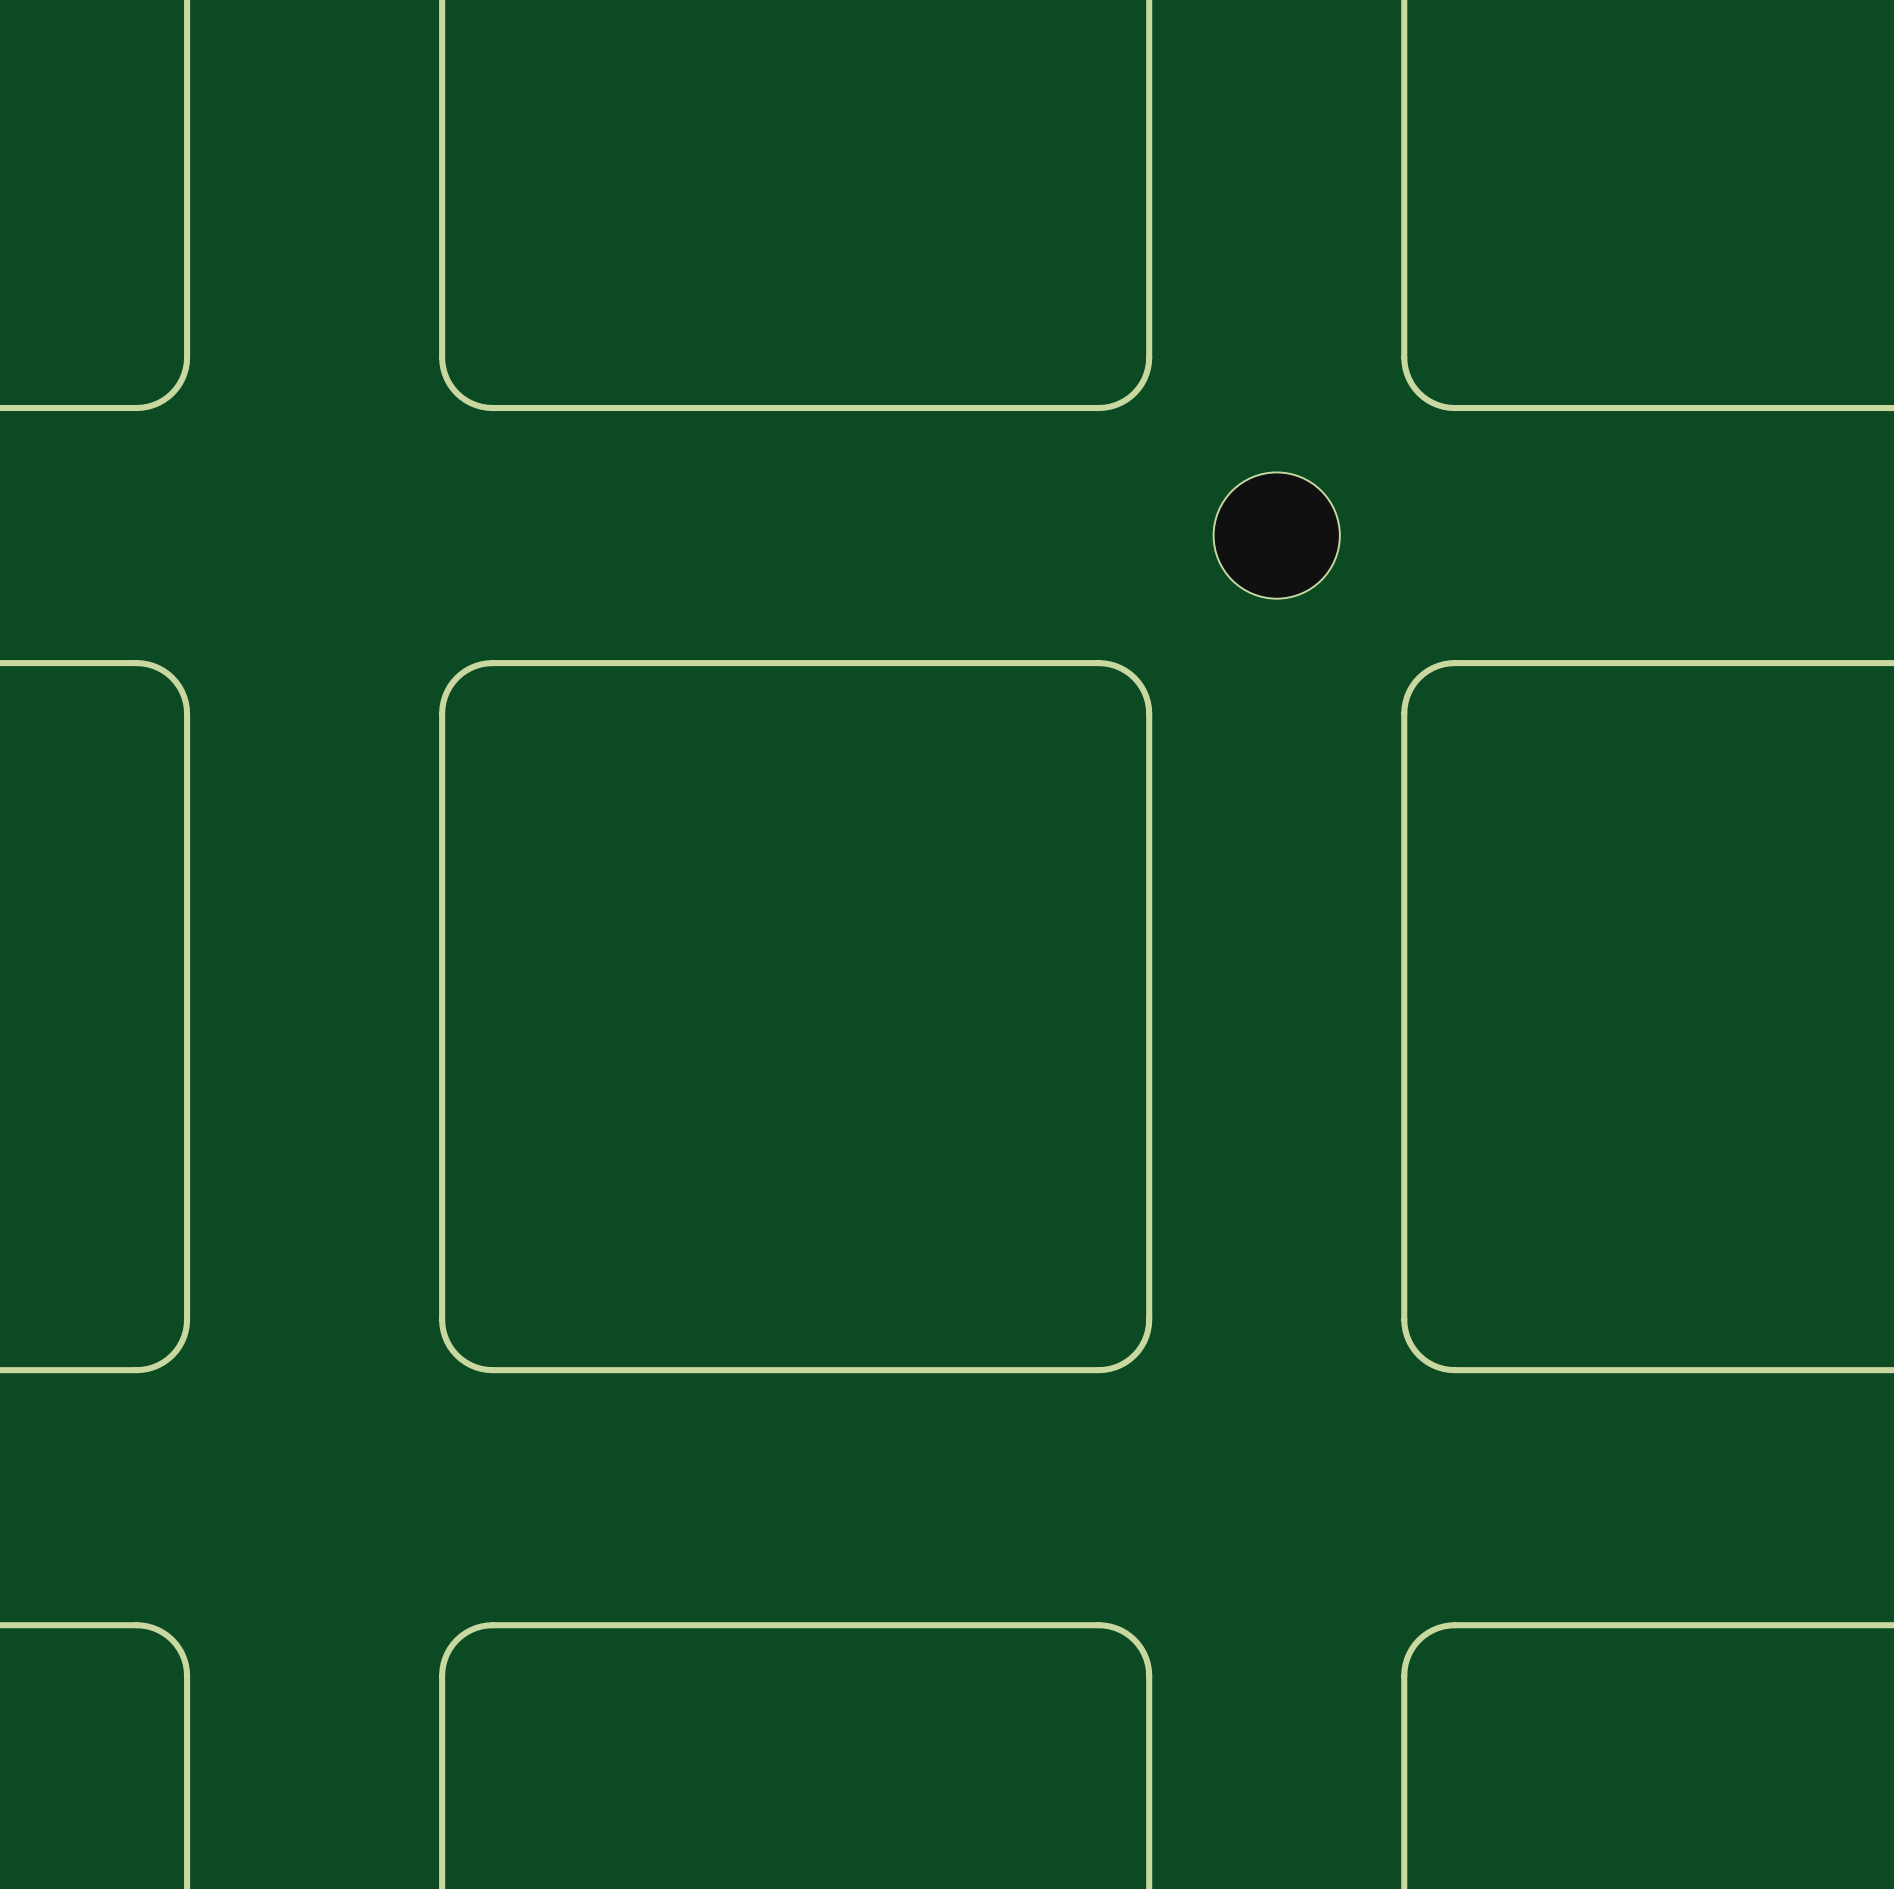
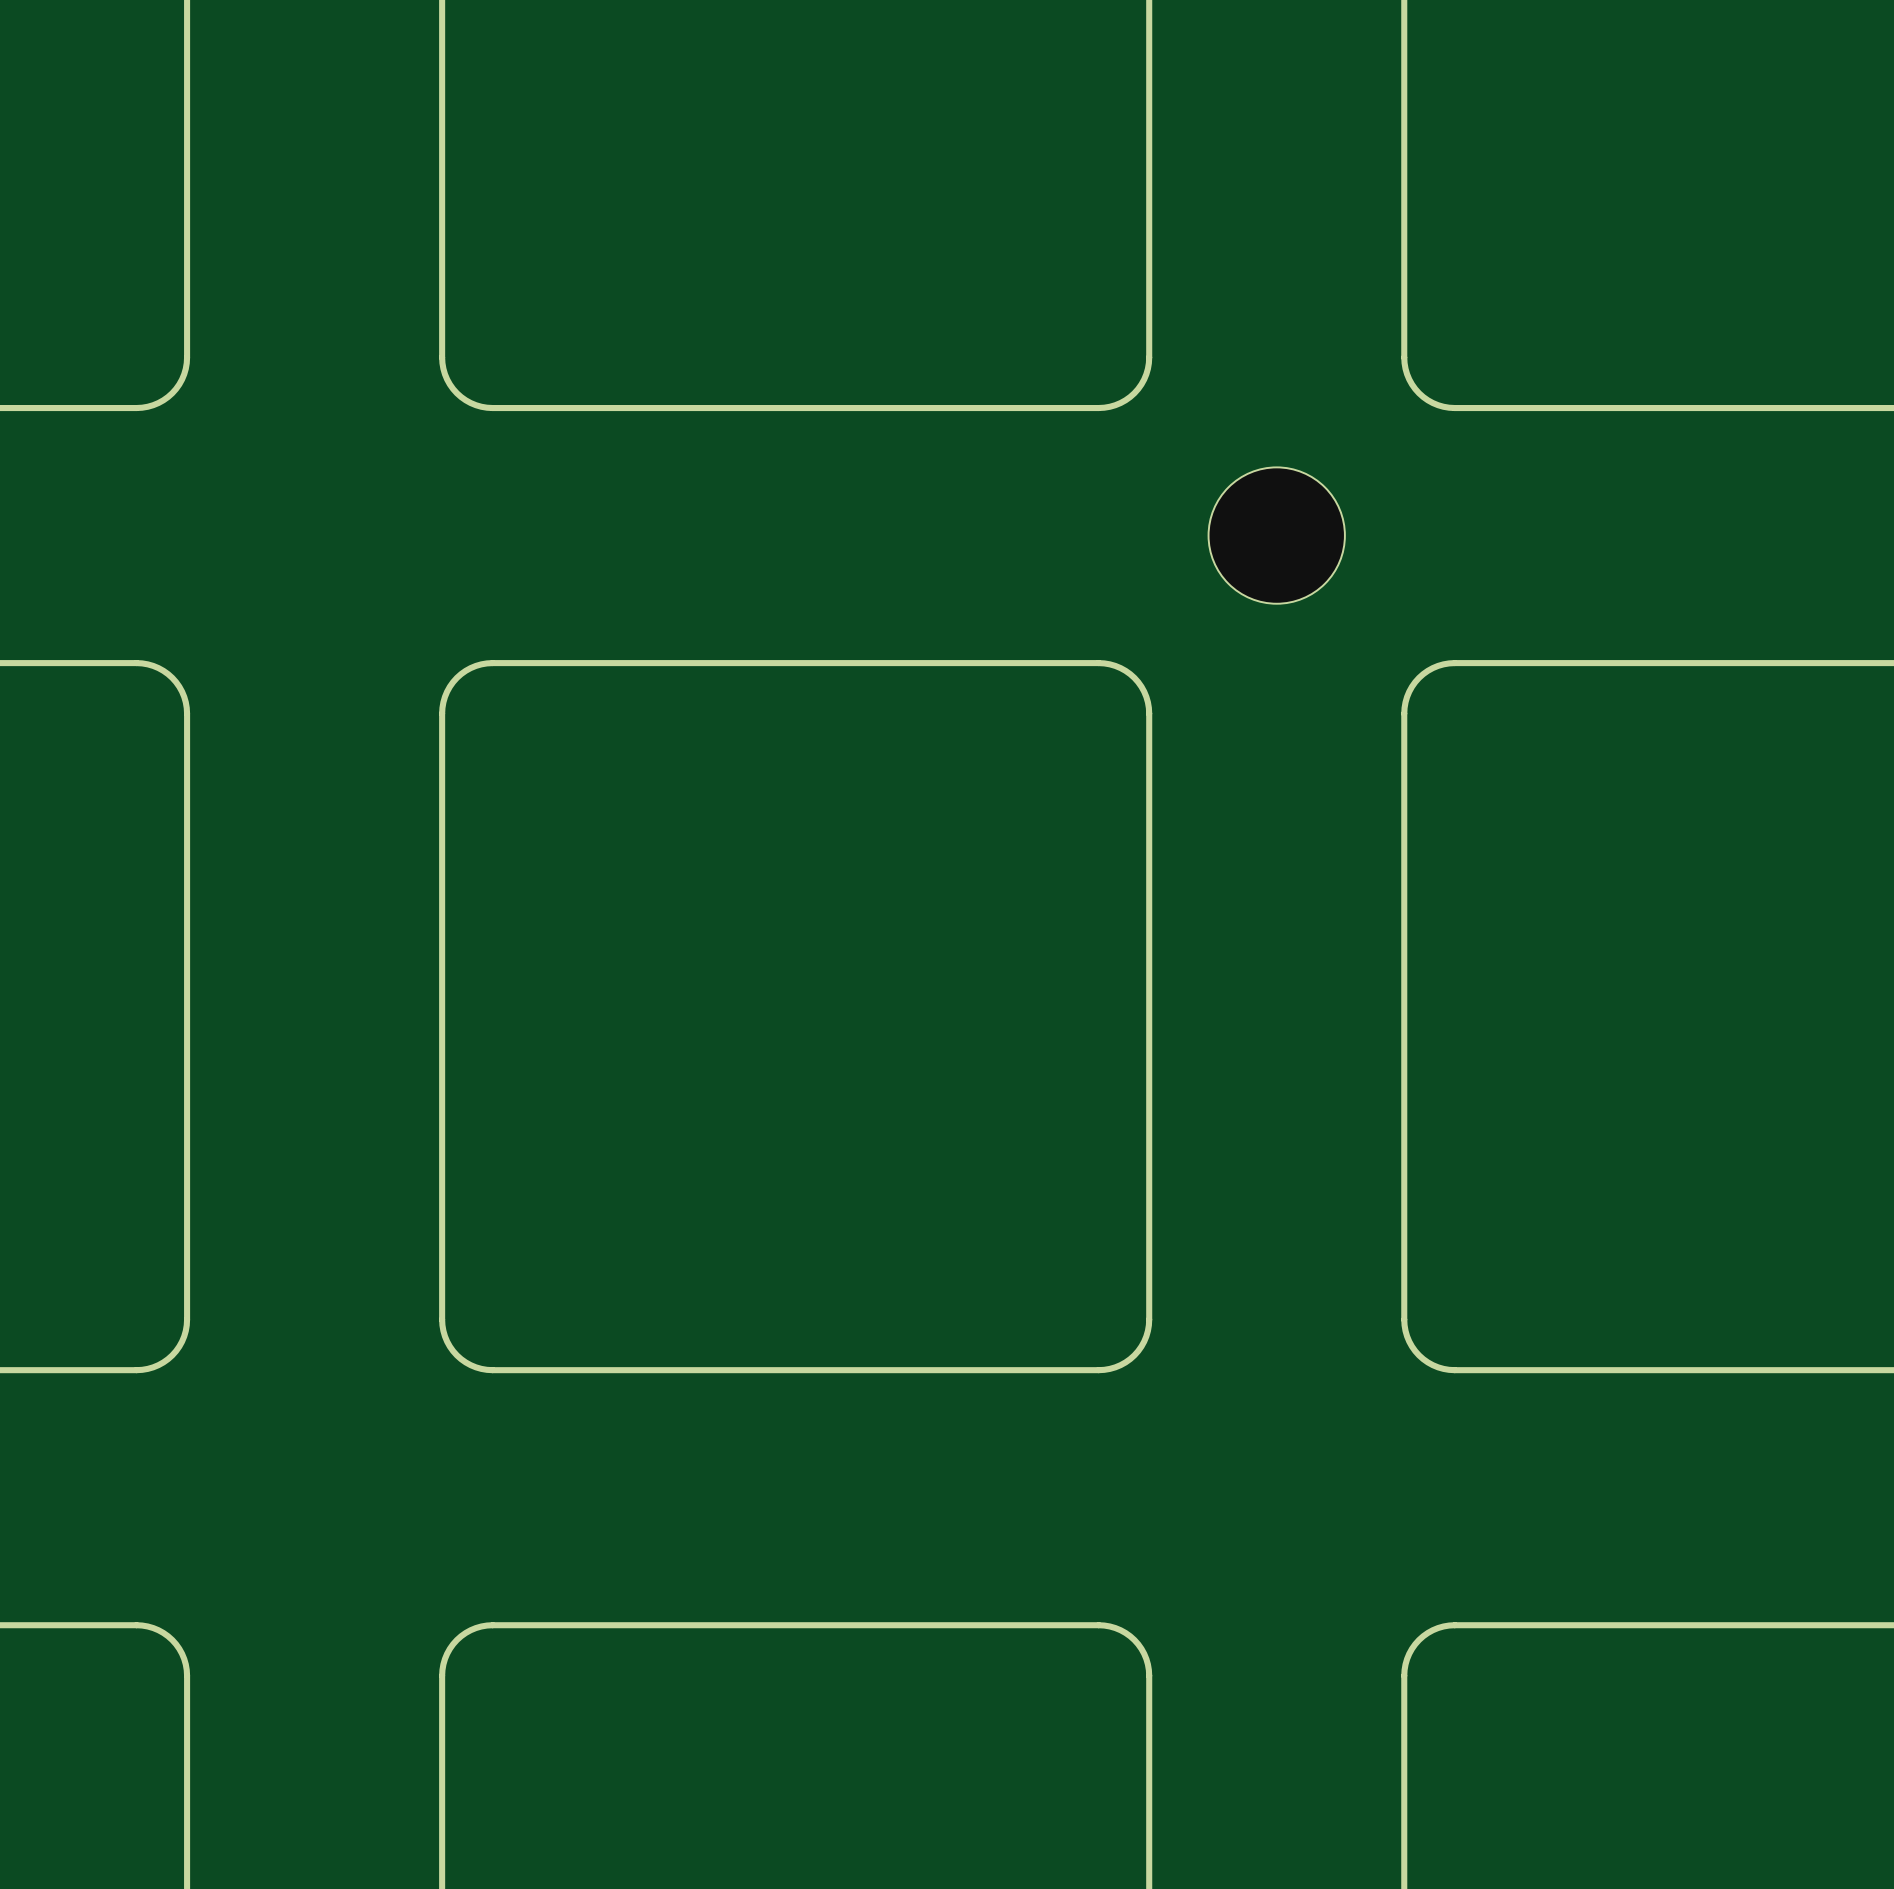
part footprint: [1213, 472, 1340, 599] -> [1208, 467, 1345, 604]

